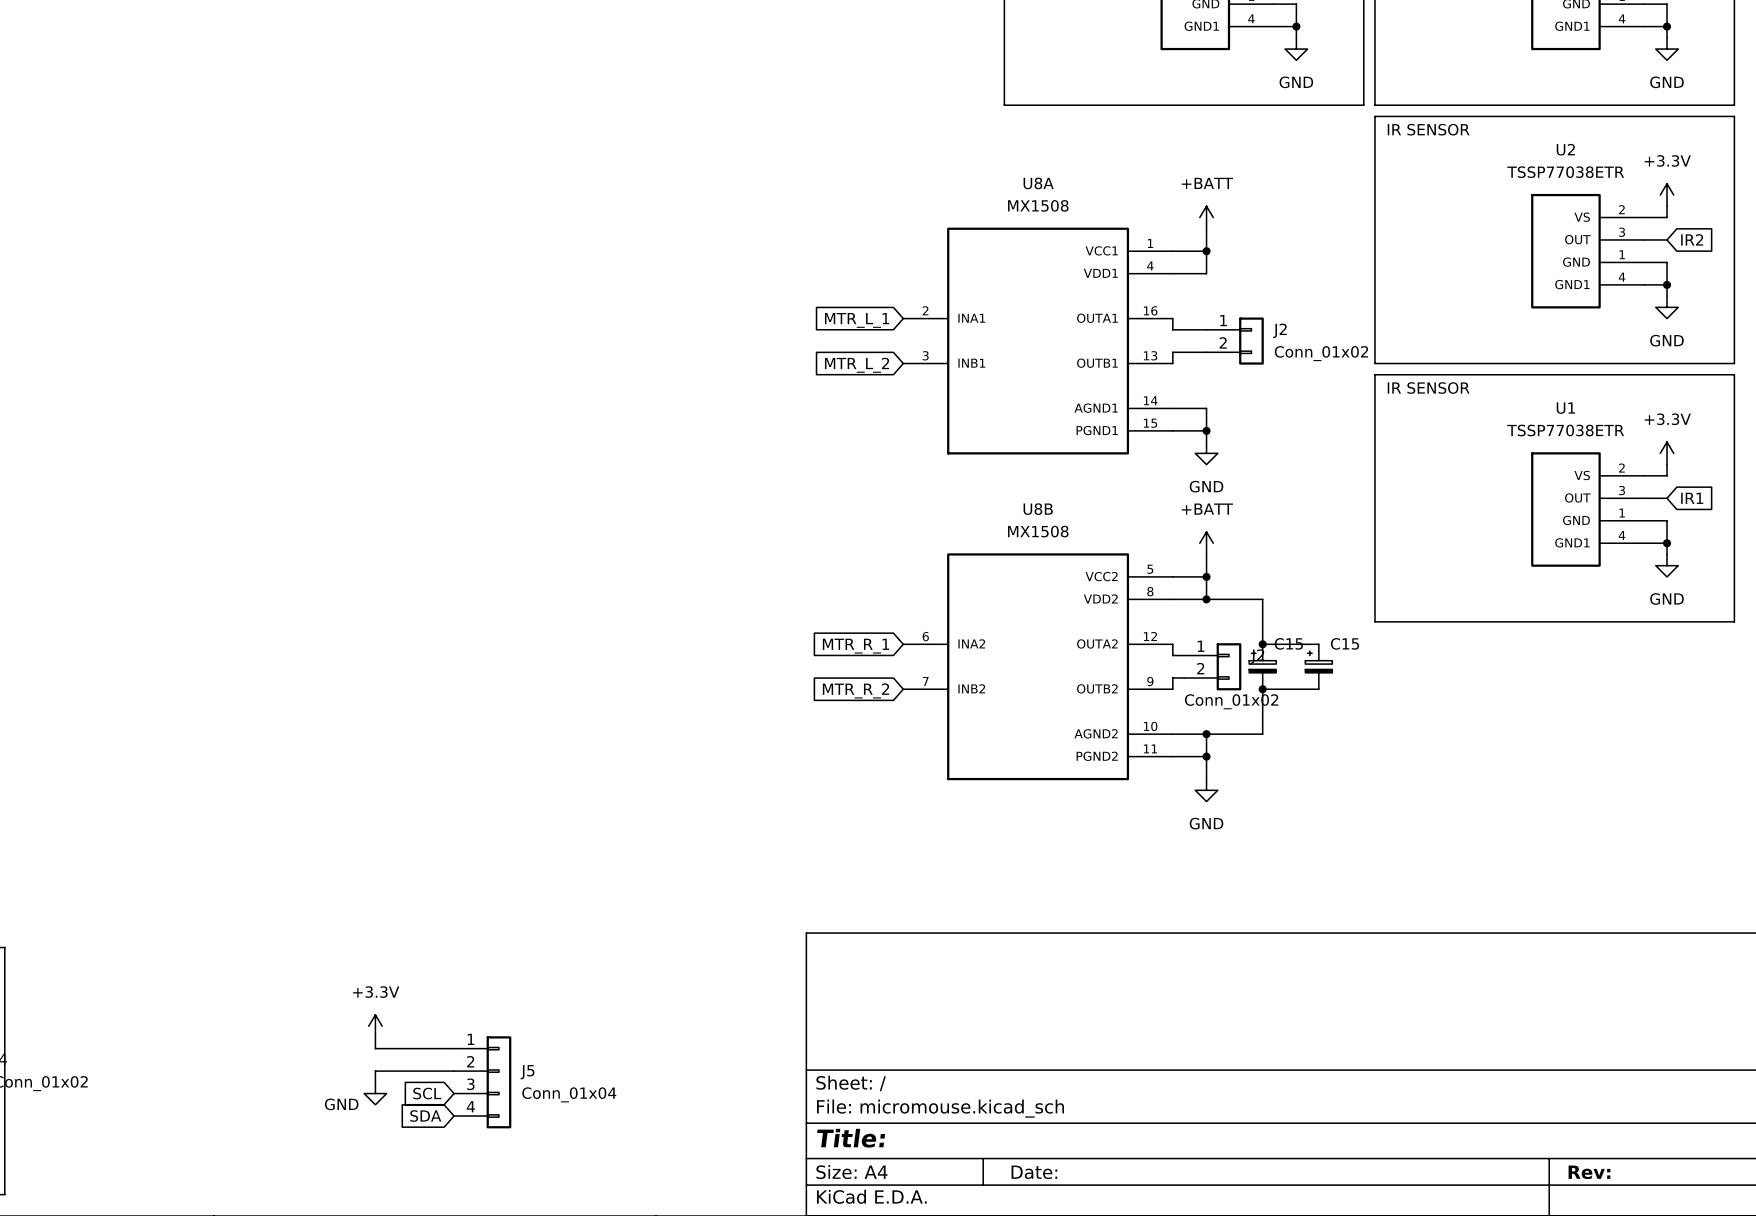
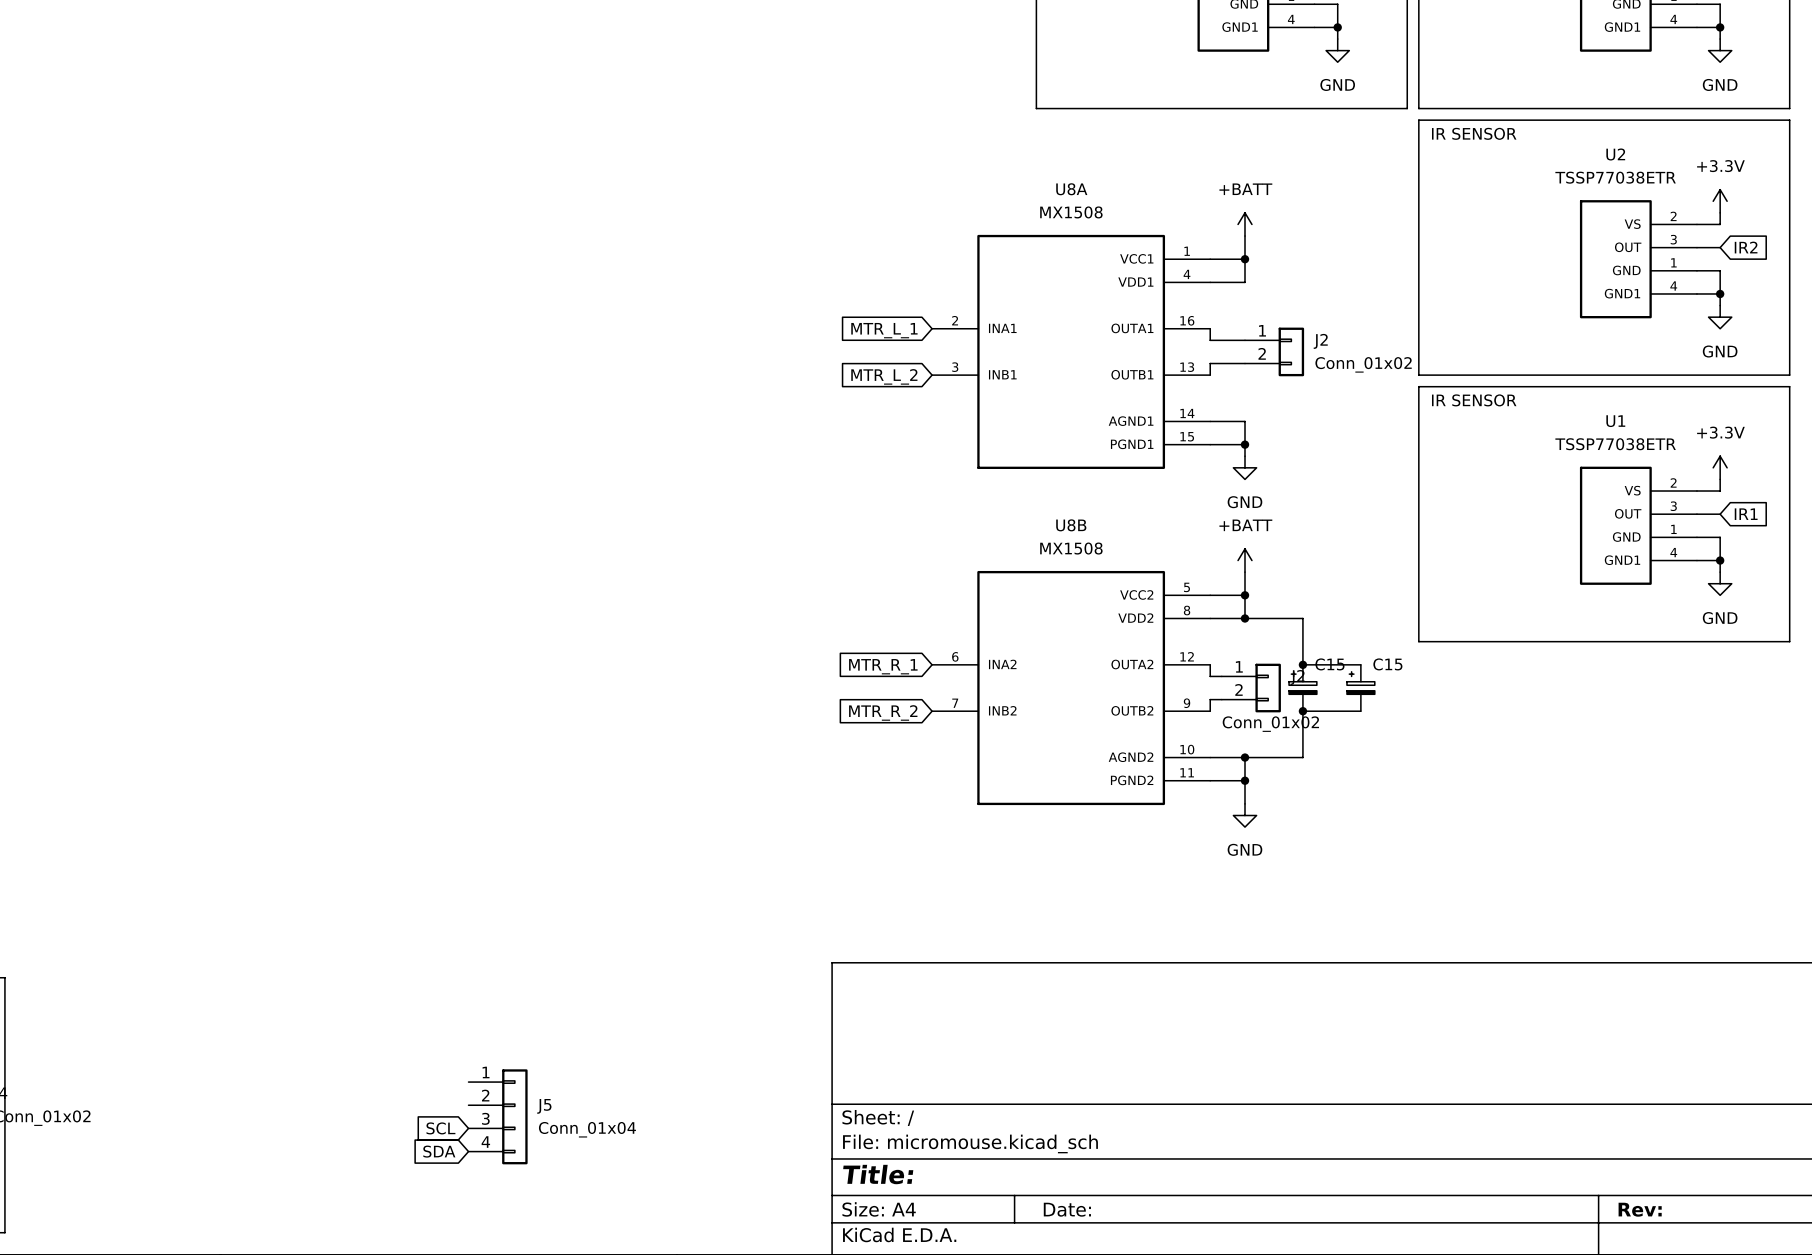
power symbol: +3.3V (375, 1026) -> none
wire: (375, 1037) (375, 1048) (454, 1048) -> none
wire: (454, 1071) (375, 1071) (375, 1082) -> none
power symbol: GND (375, 1093) -> none

